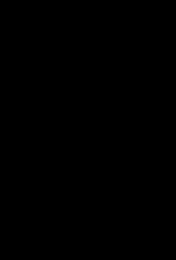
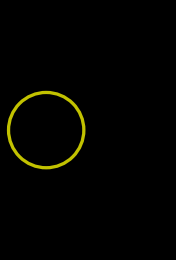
round board edge: none -> [6, 90, 86, 170]

